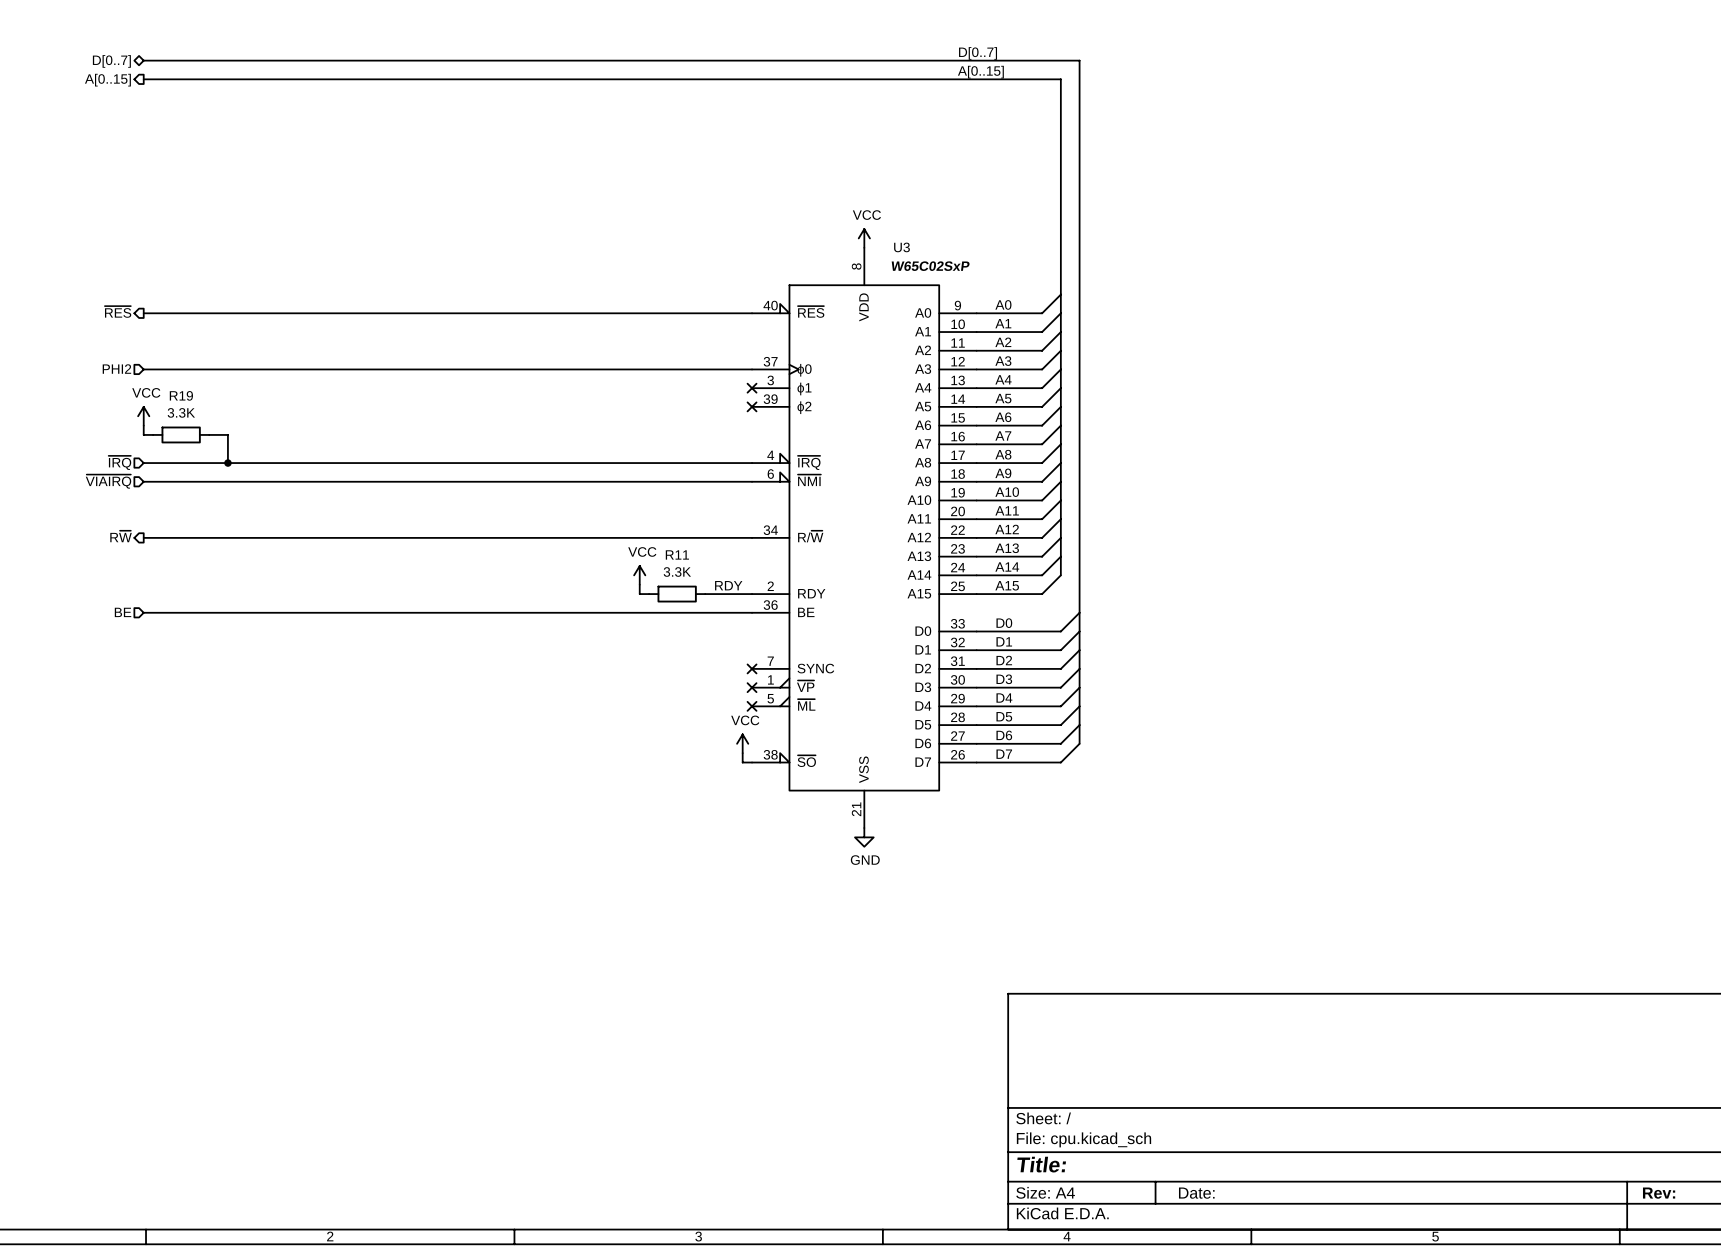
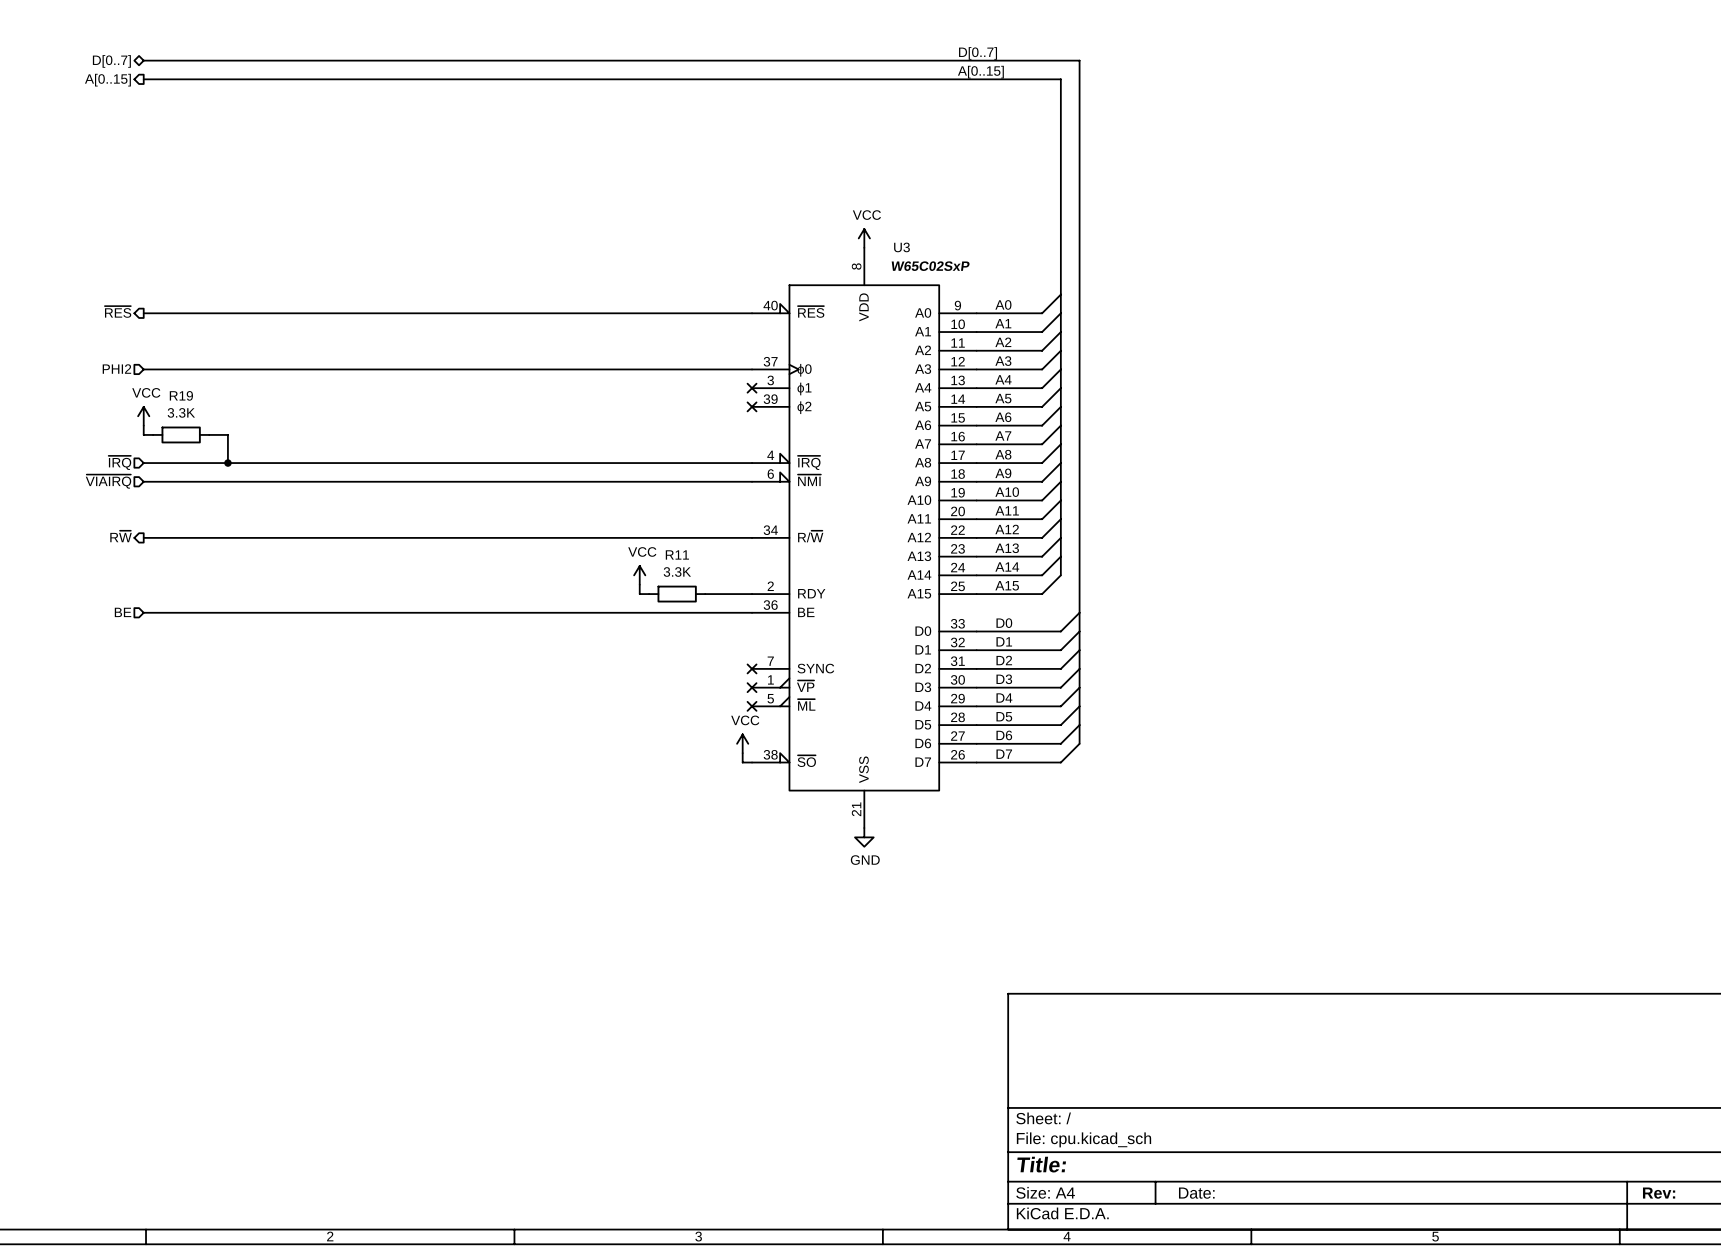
label: RDY (728, 585) -> none

